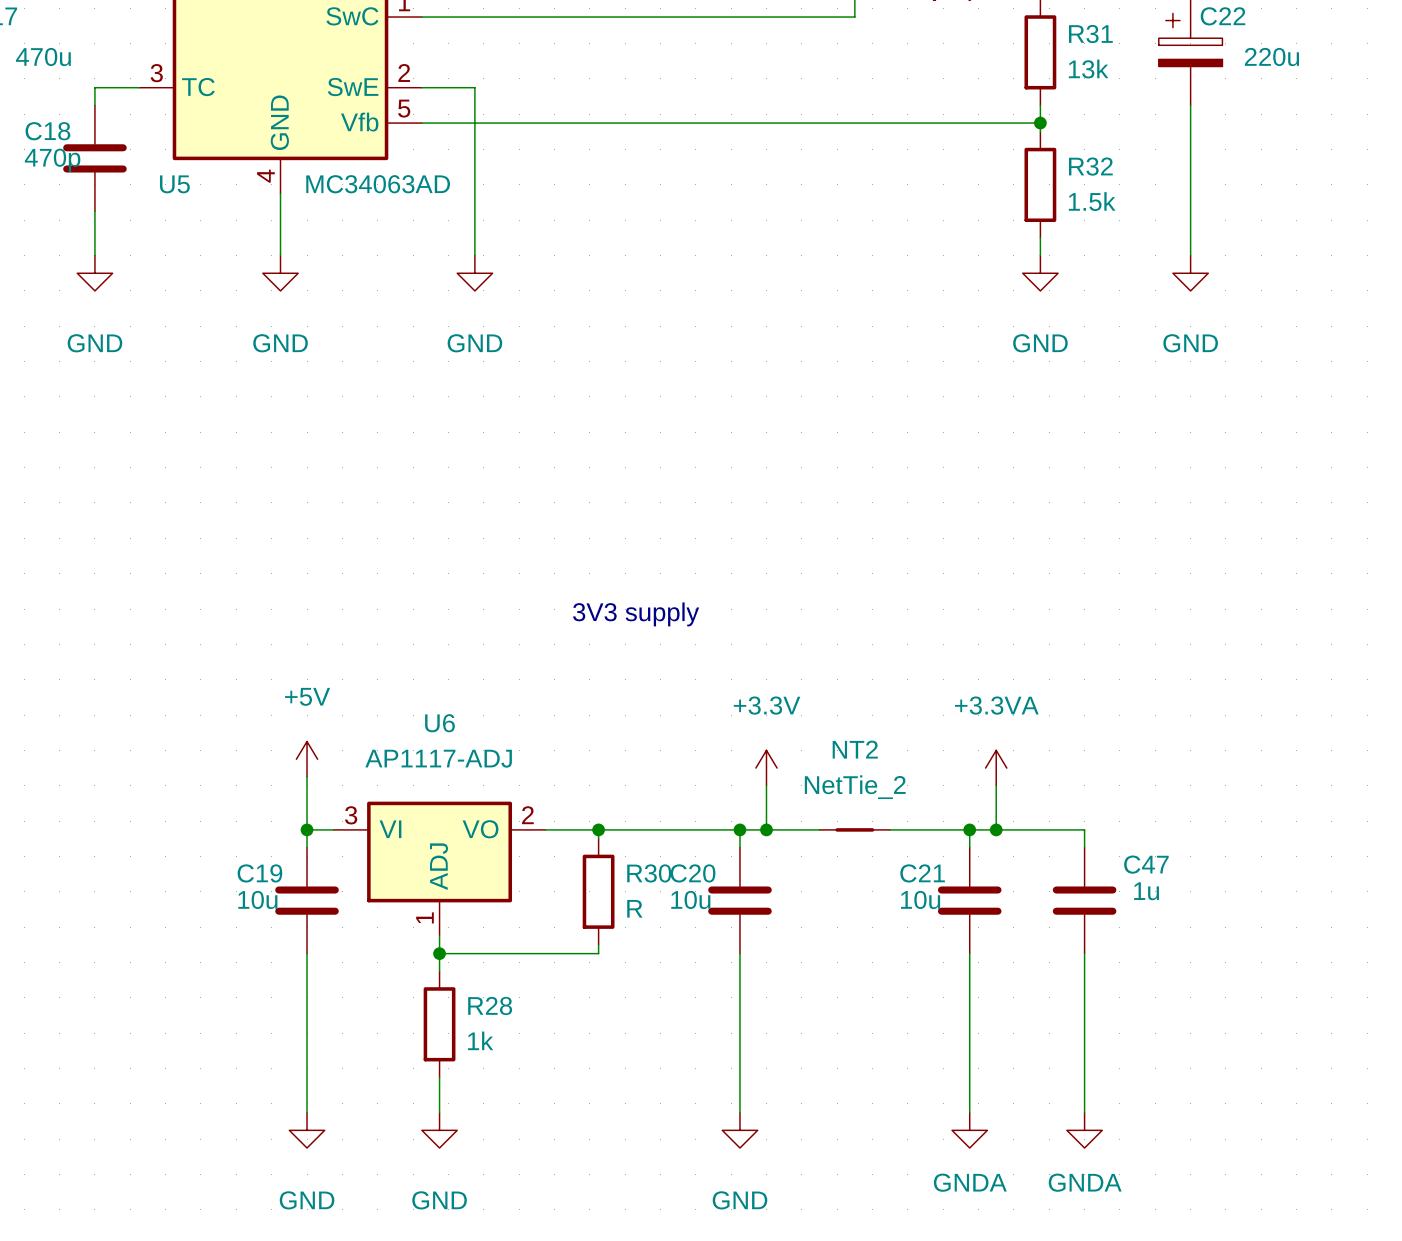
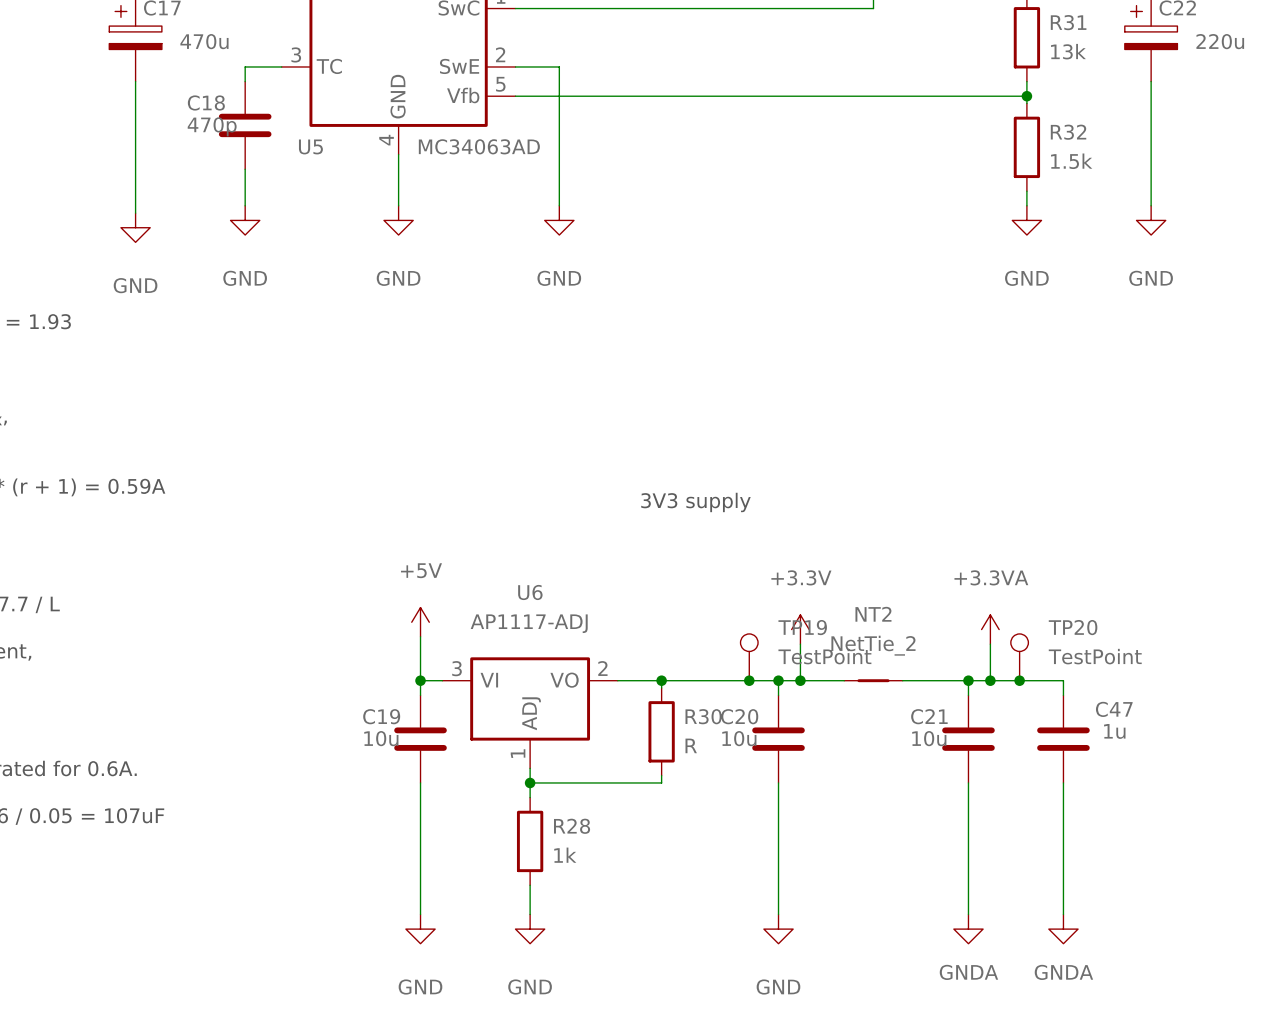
TP19: none -> TestPoint (749, 657)
TP20: none -> TestPoint (1019, 657)
junction: none -> (749, 680)
junction: none -> (1019, 680)

